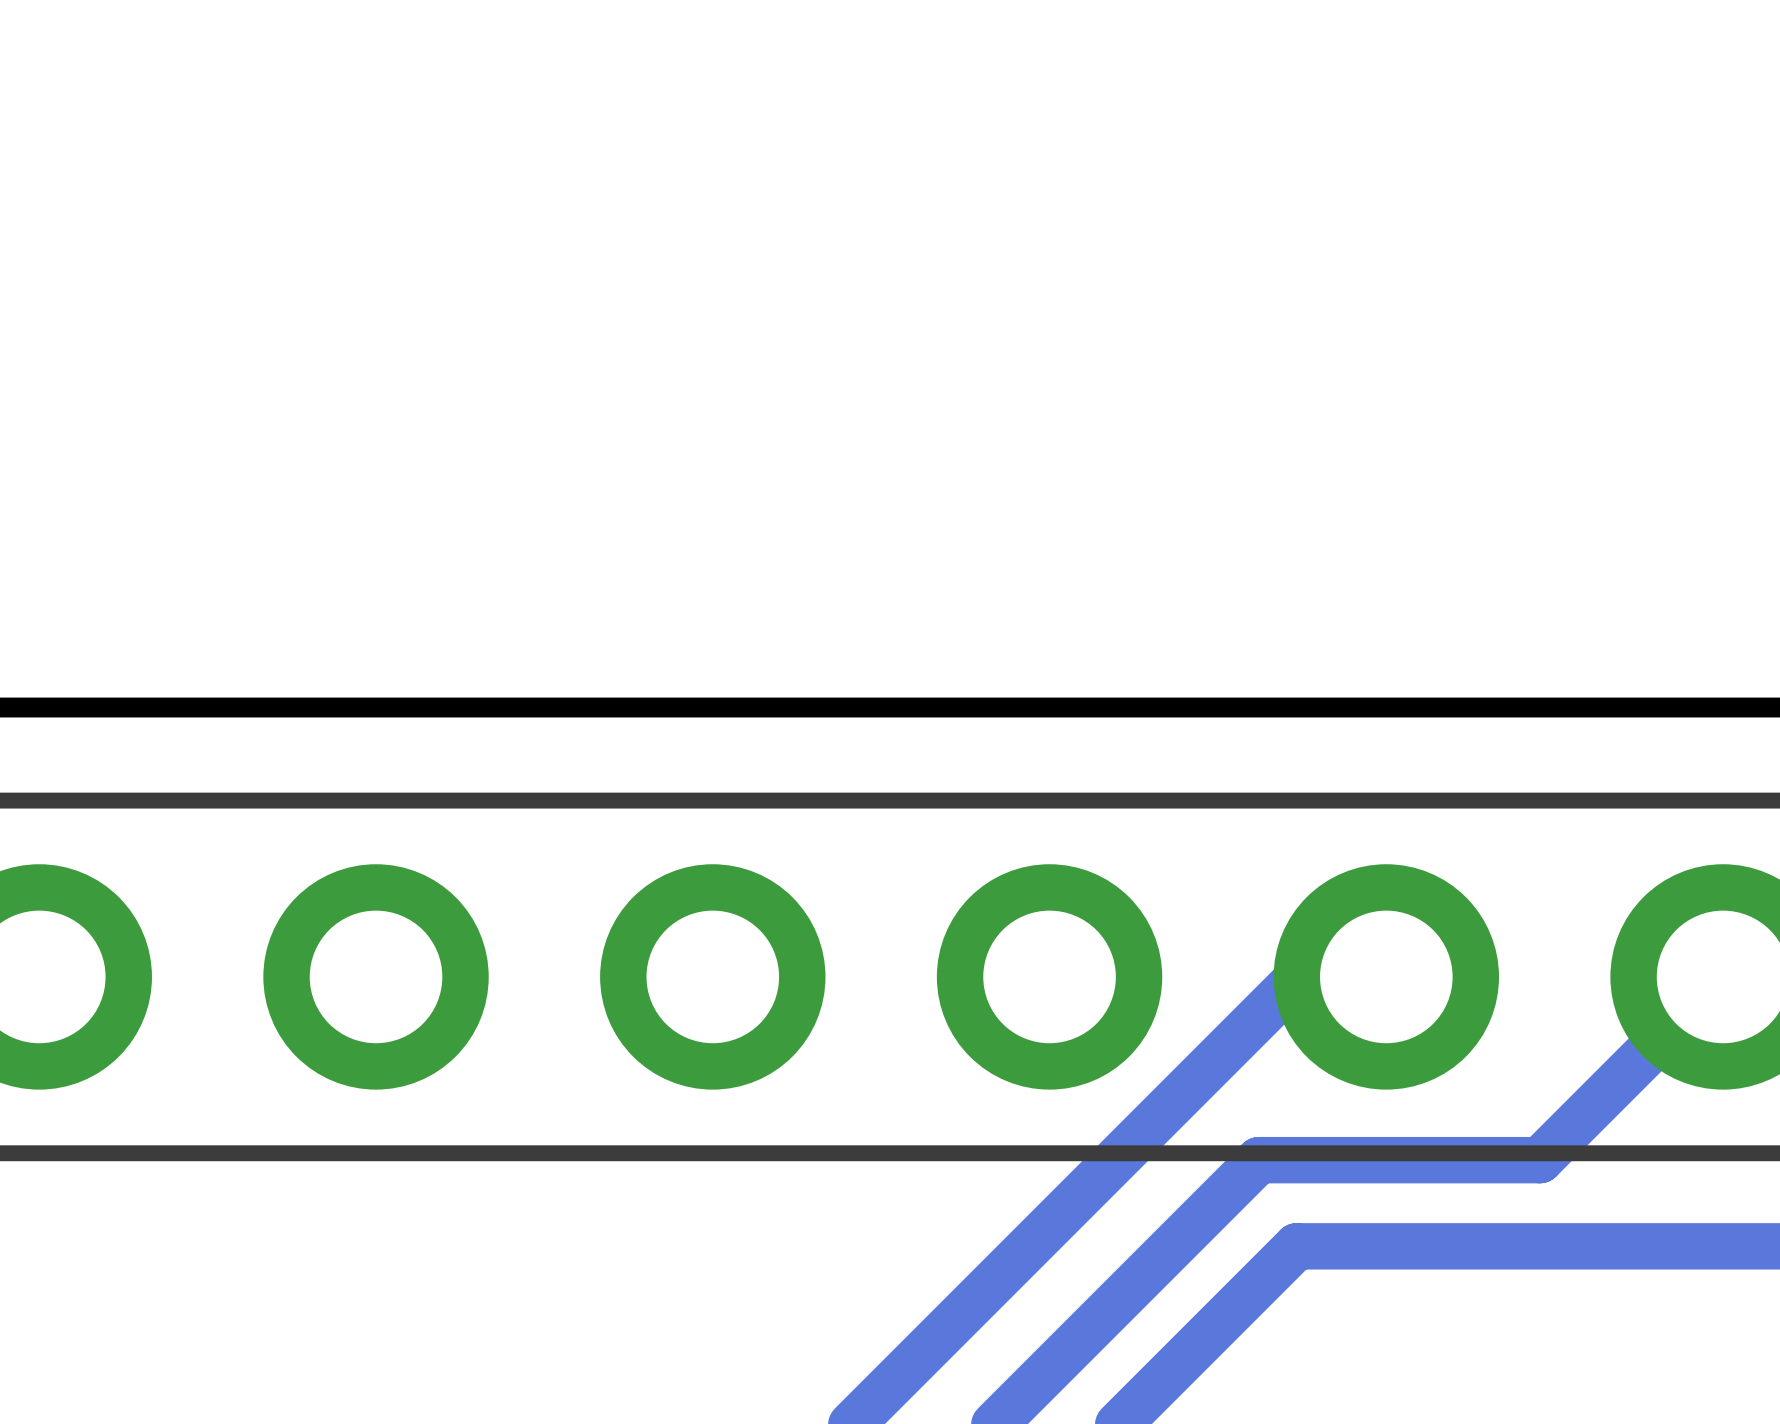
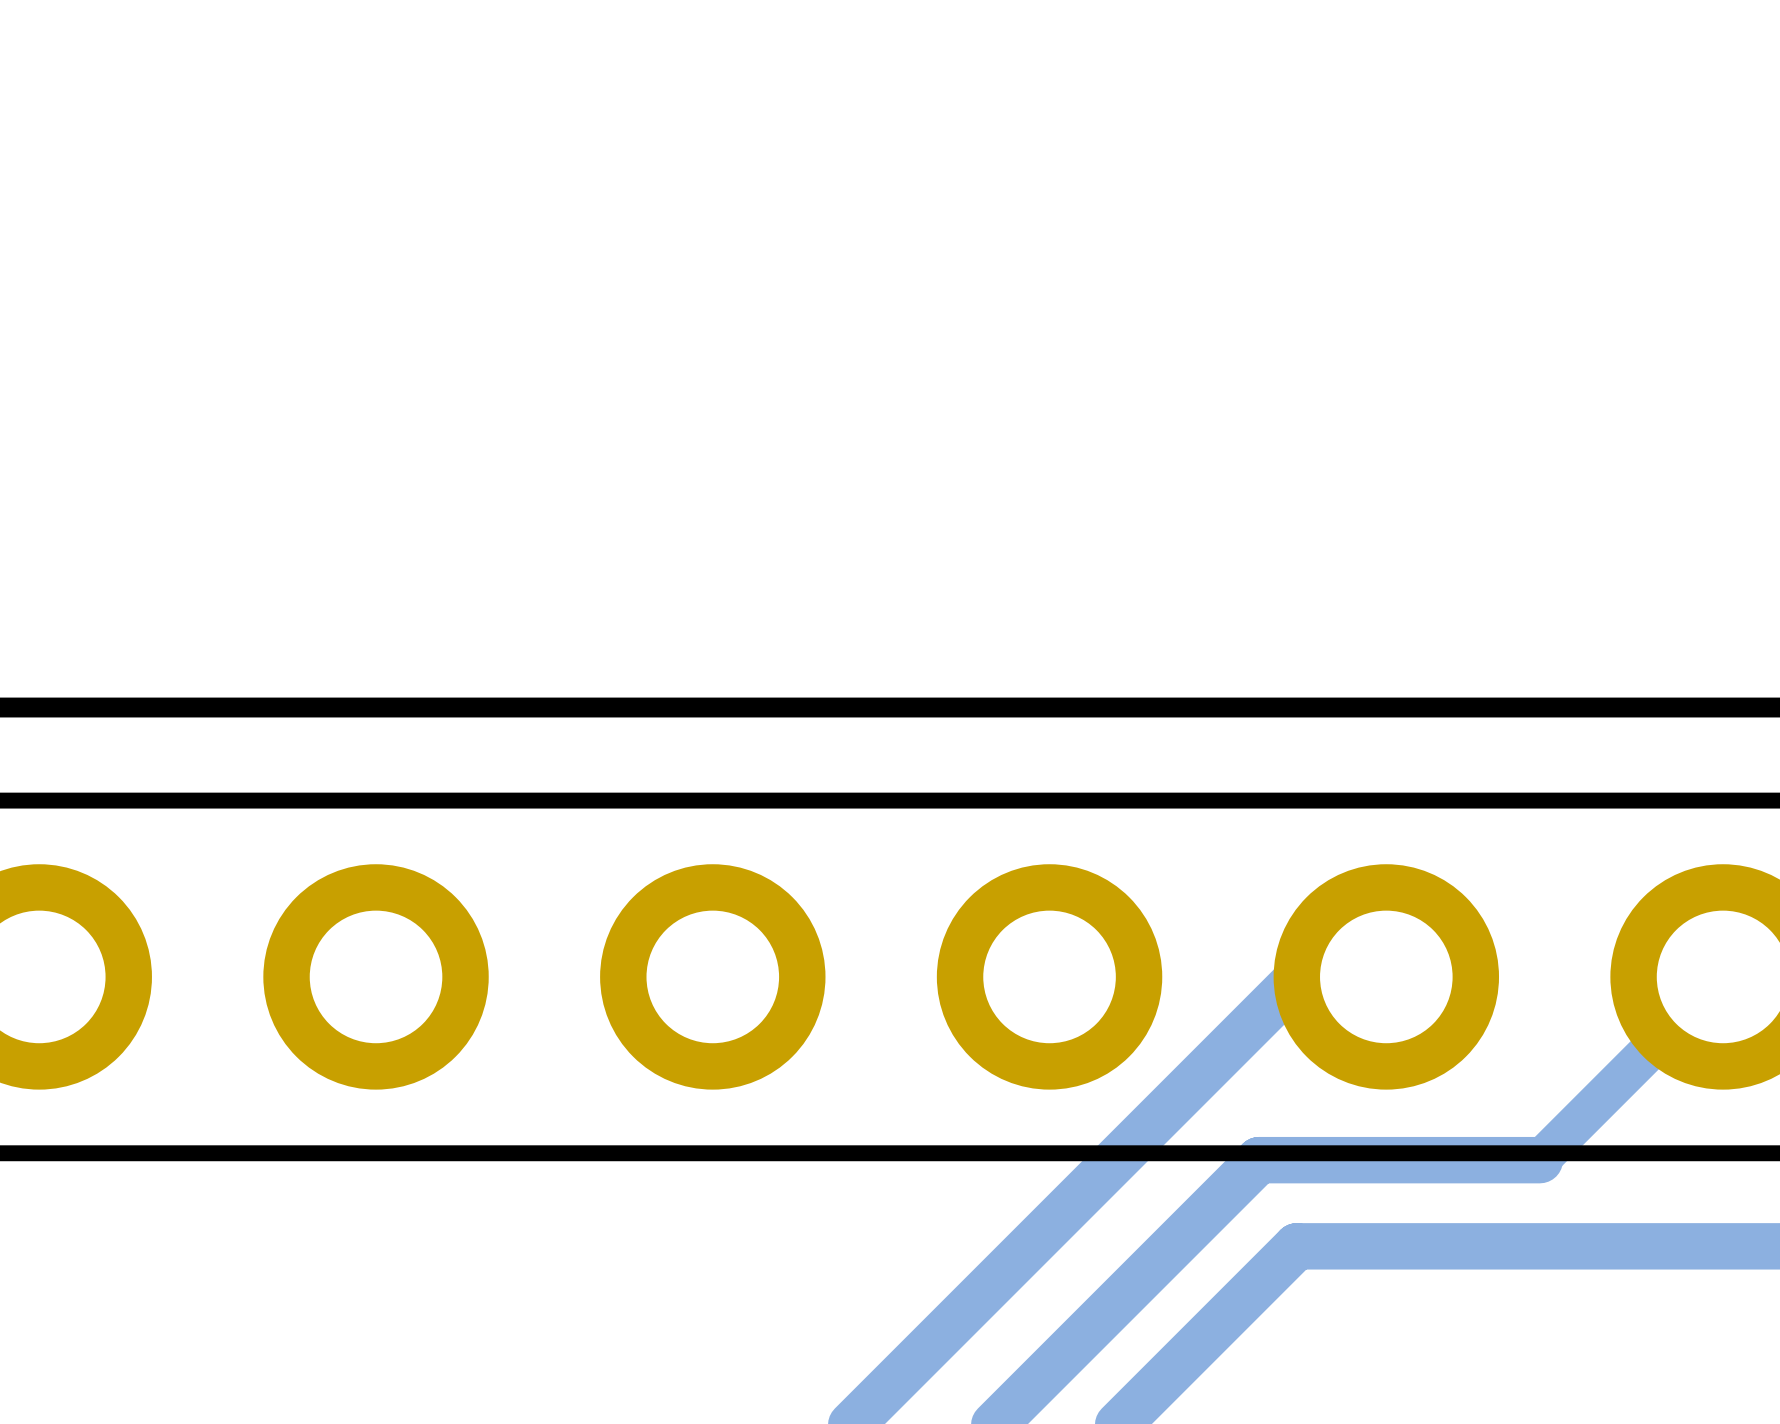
track width: thick (1723, 976) (1539, 1160) -> thin (1723, 976) (1539, 1160)

